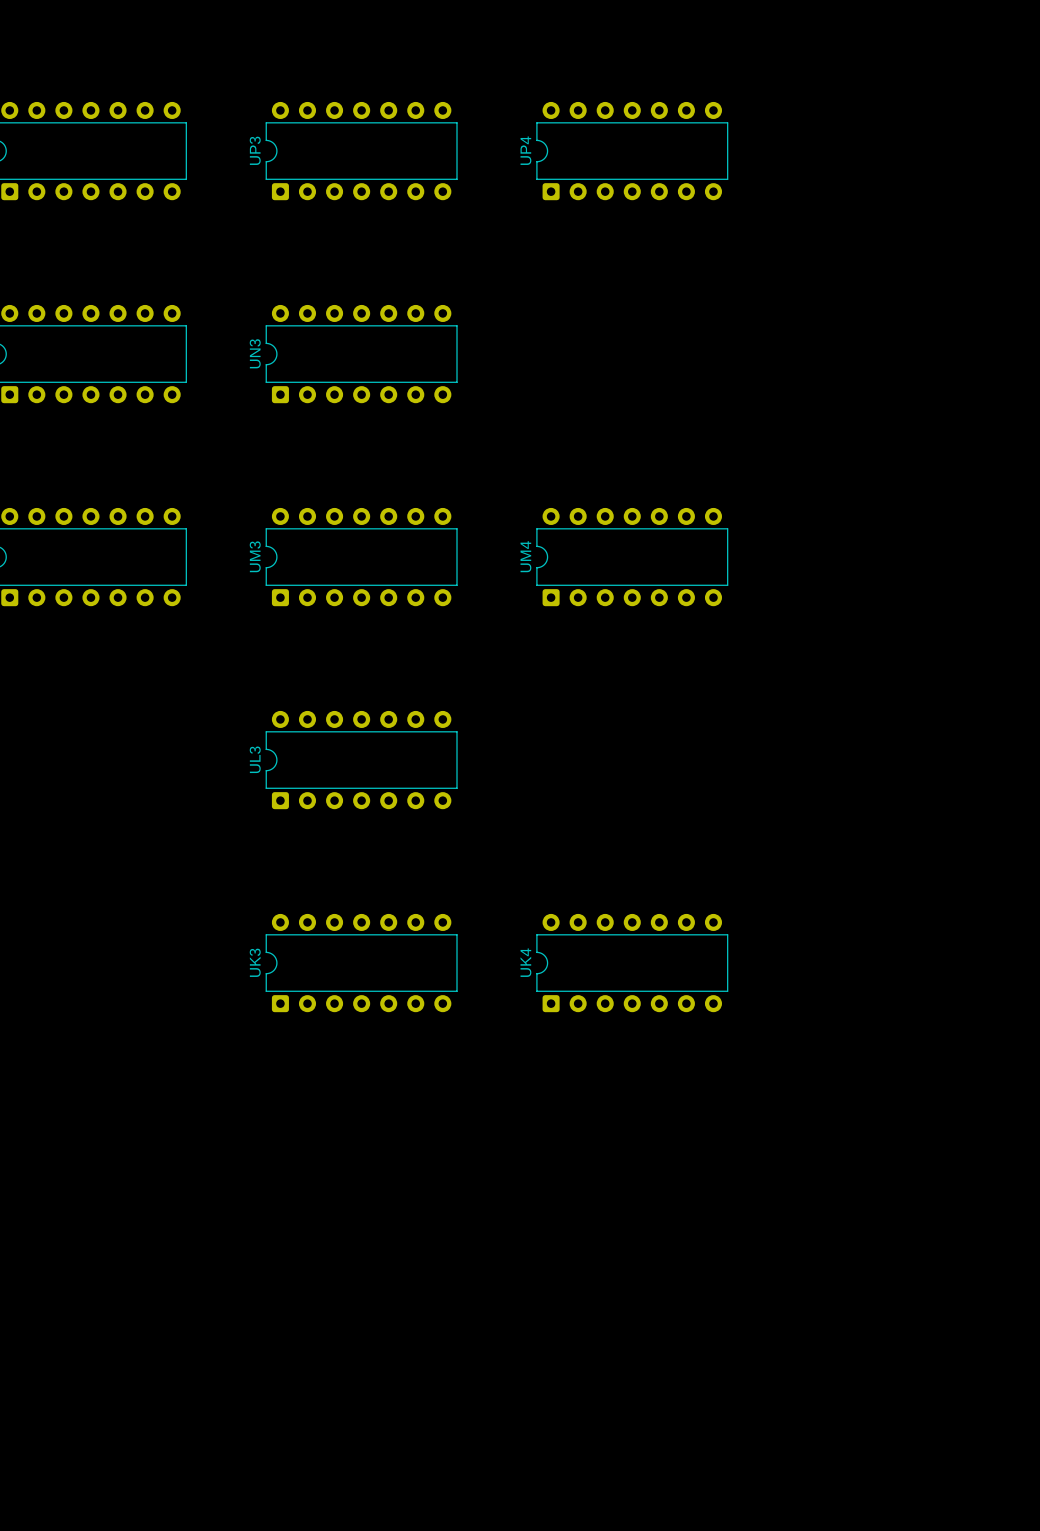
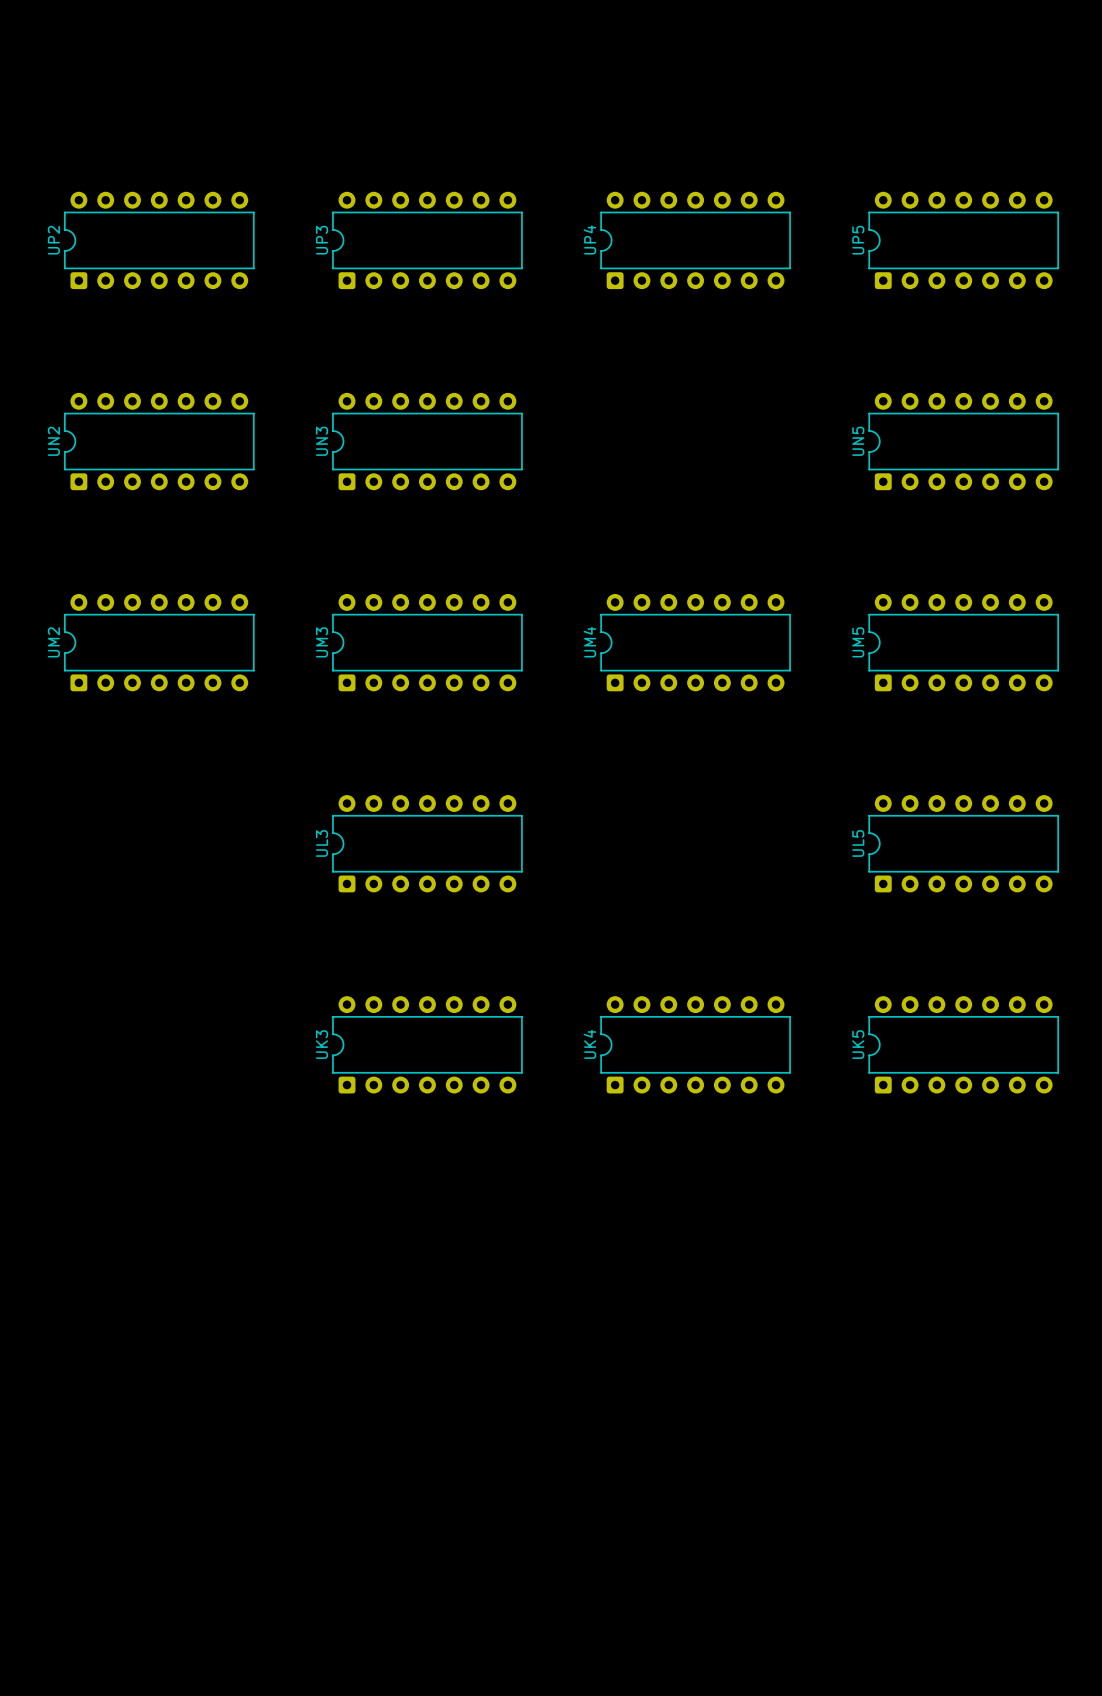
UP5: none -> (963, 240)
UN5: none -> (963, 441)
UM5: none -> (963, 642)
UL5: none -> (963, 843)
UK5: none -> (963, 1044)

